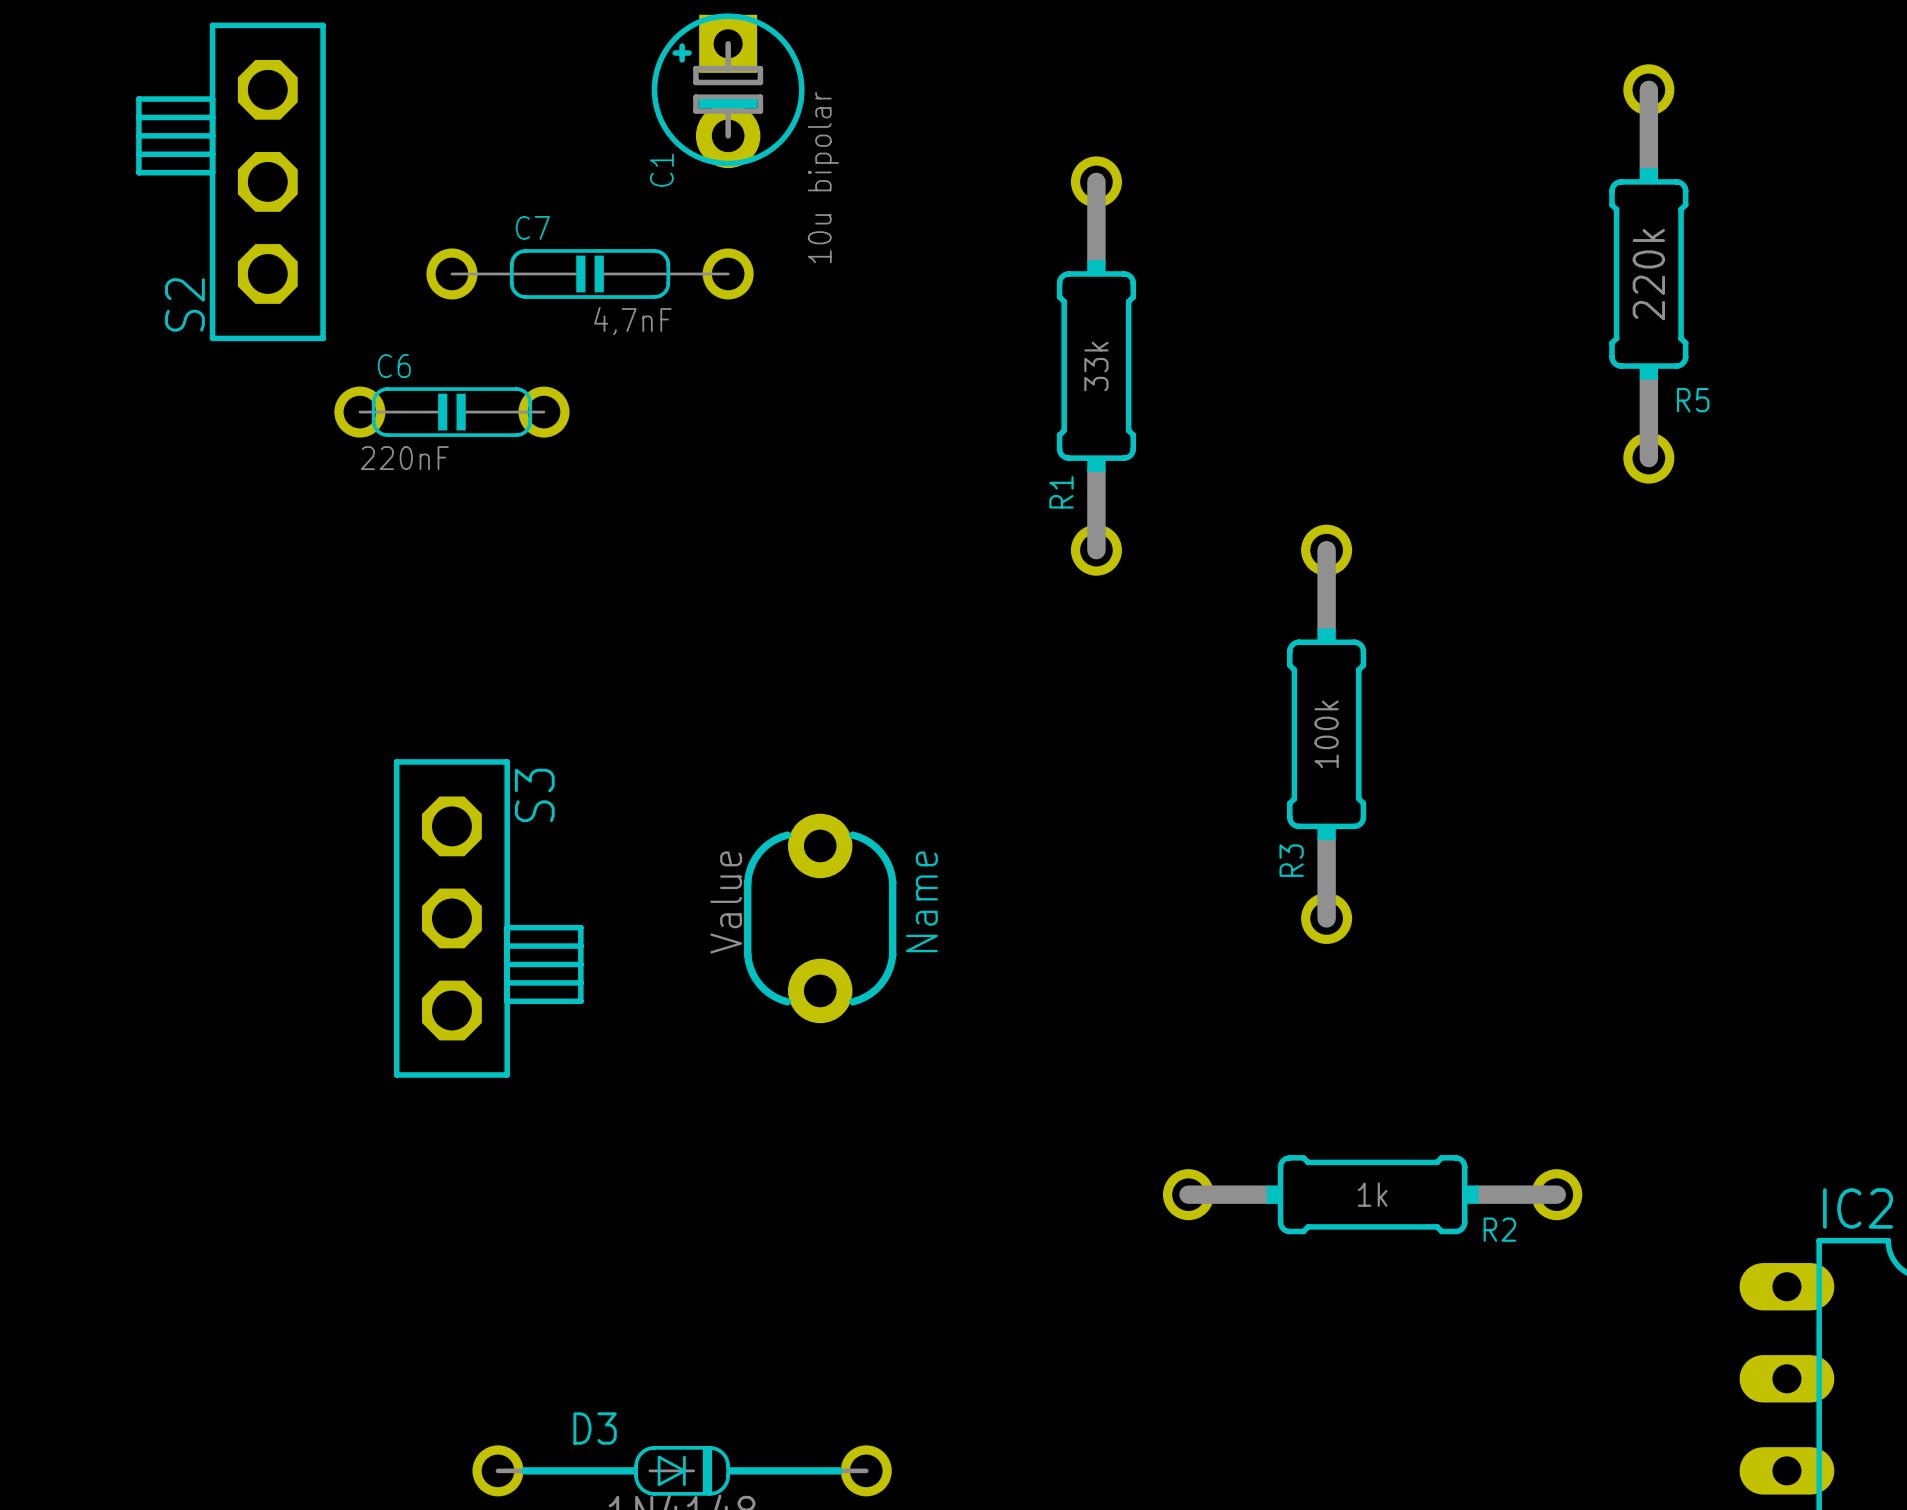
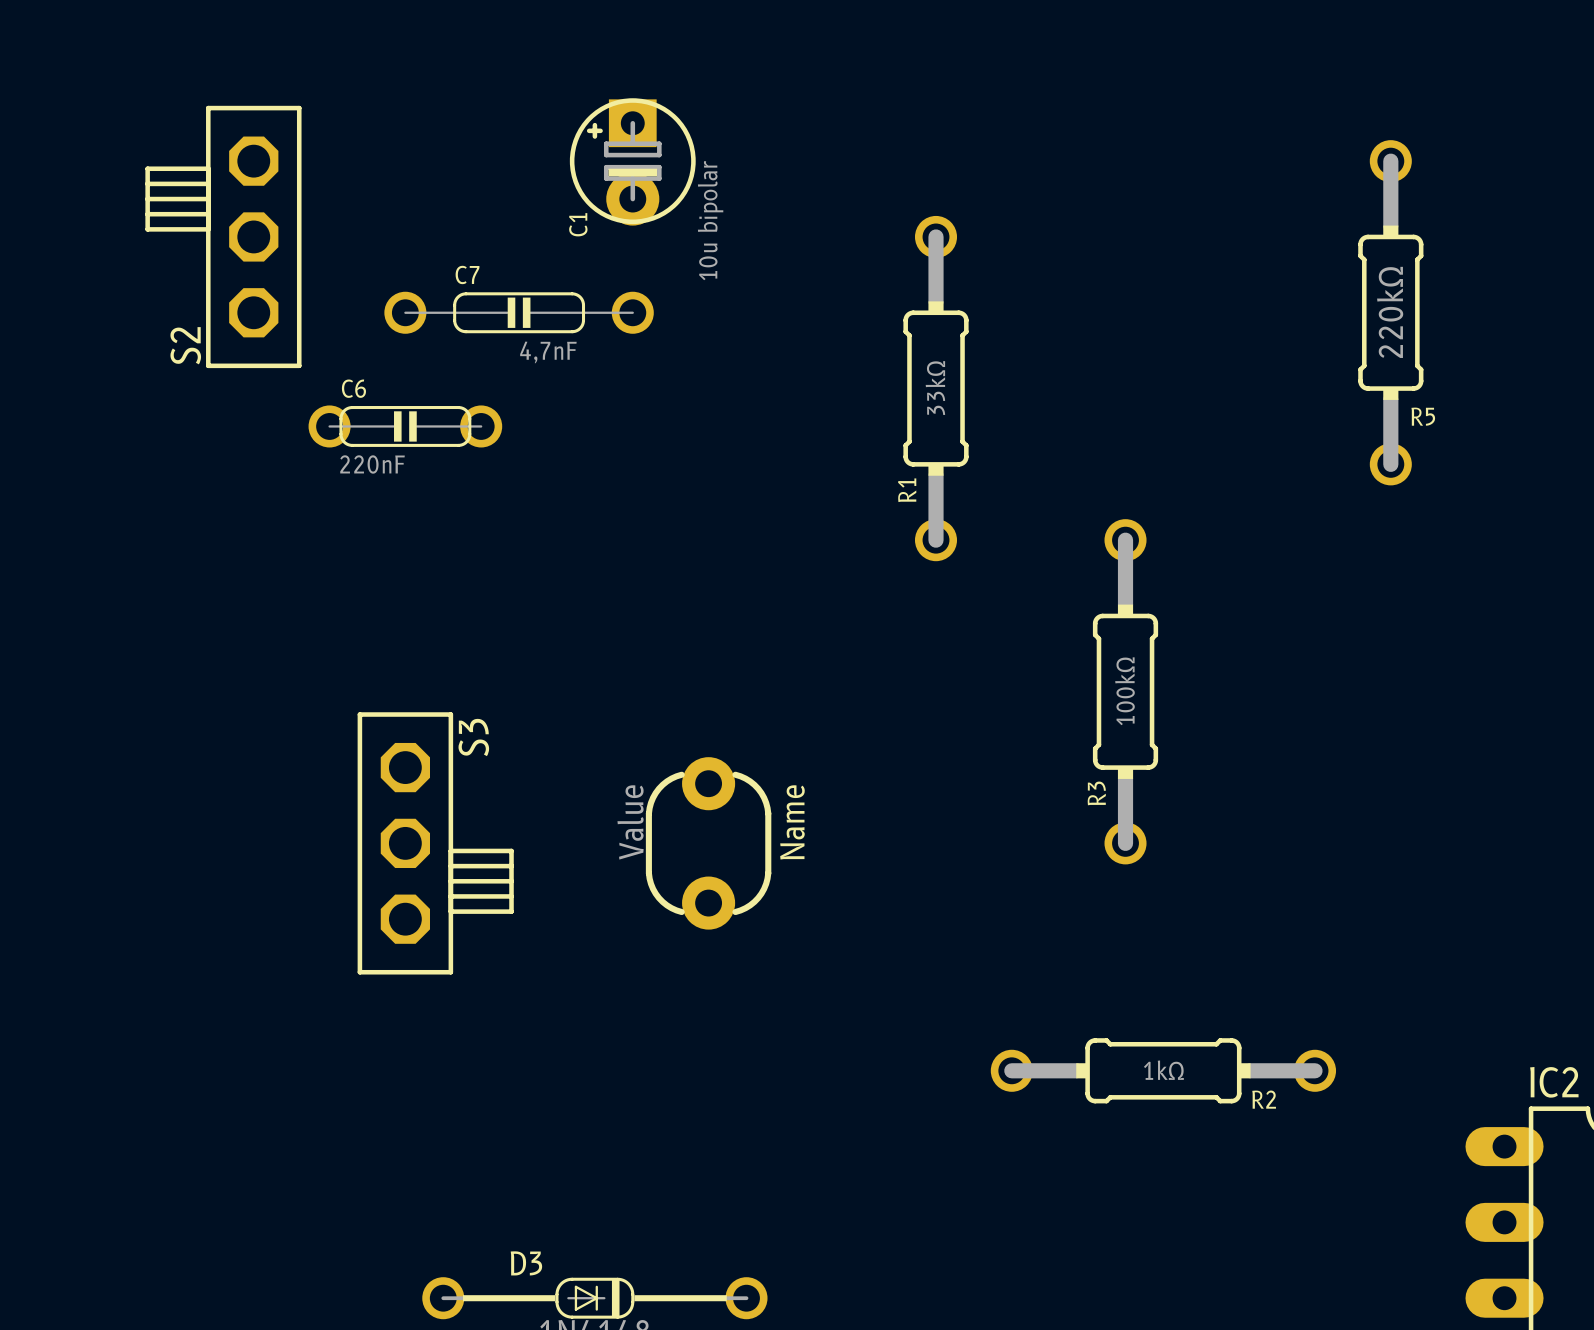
R5 value: 220k (1648, 274) -> 220kΩ (1390, 312)
R1 value: 33k (1096, 366) -> 33kΩ (935, 388)
R3 value: 100k (1326, 734) -> 100kΩ (1125, 691)
R2 value: 1k (1372, 1194) -> 1kΩ (1163, 1070)

